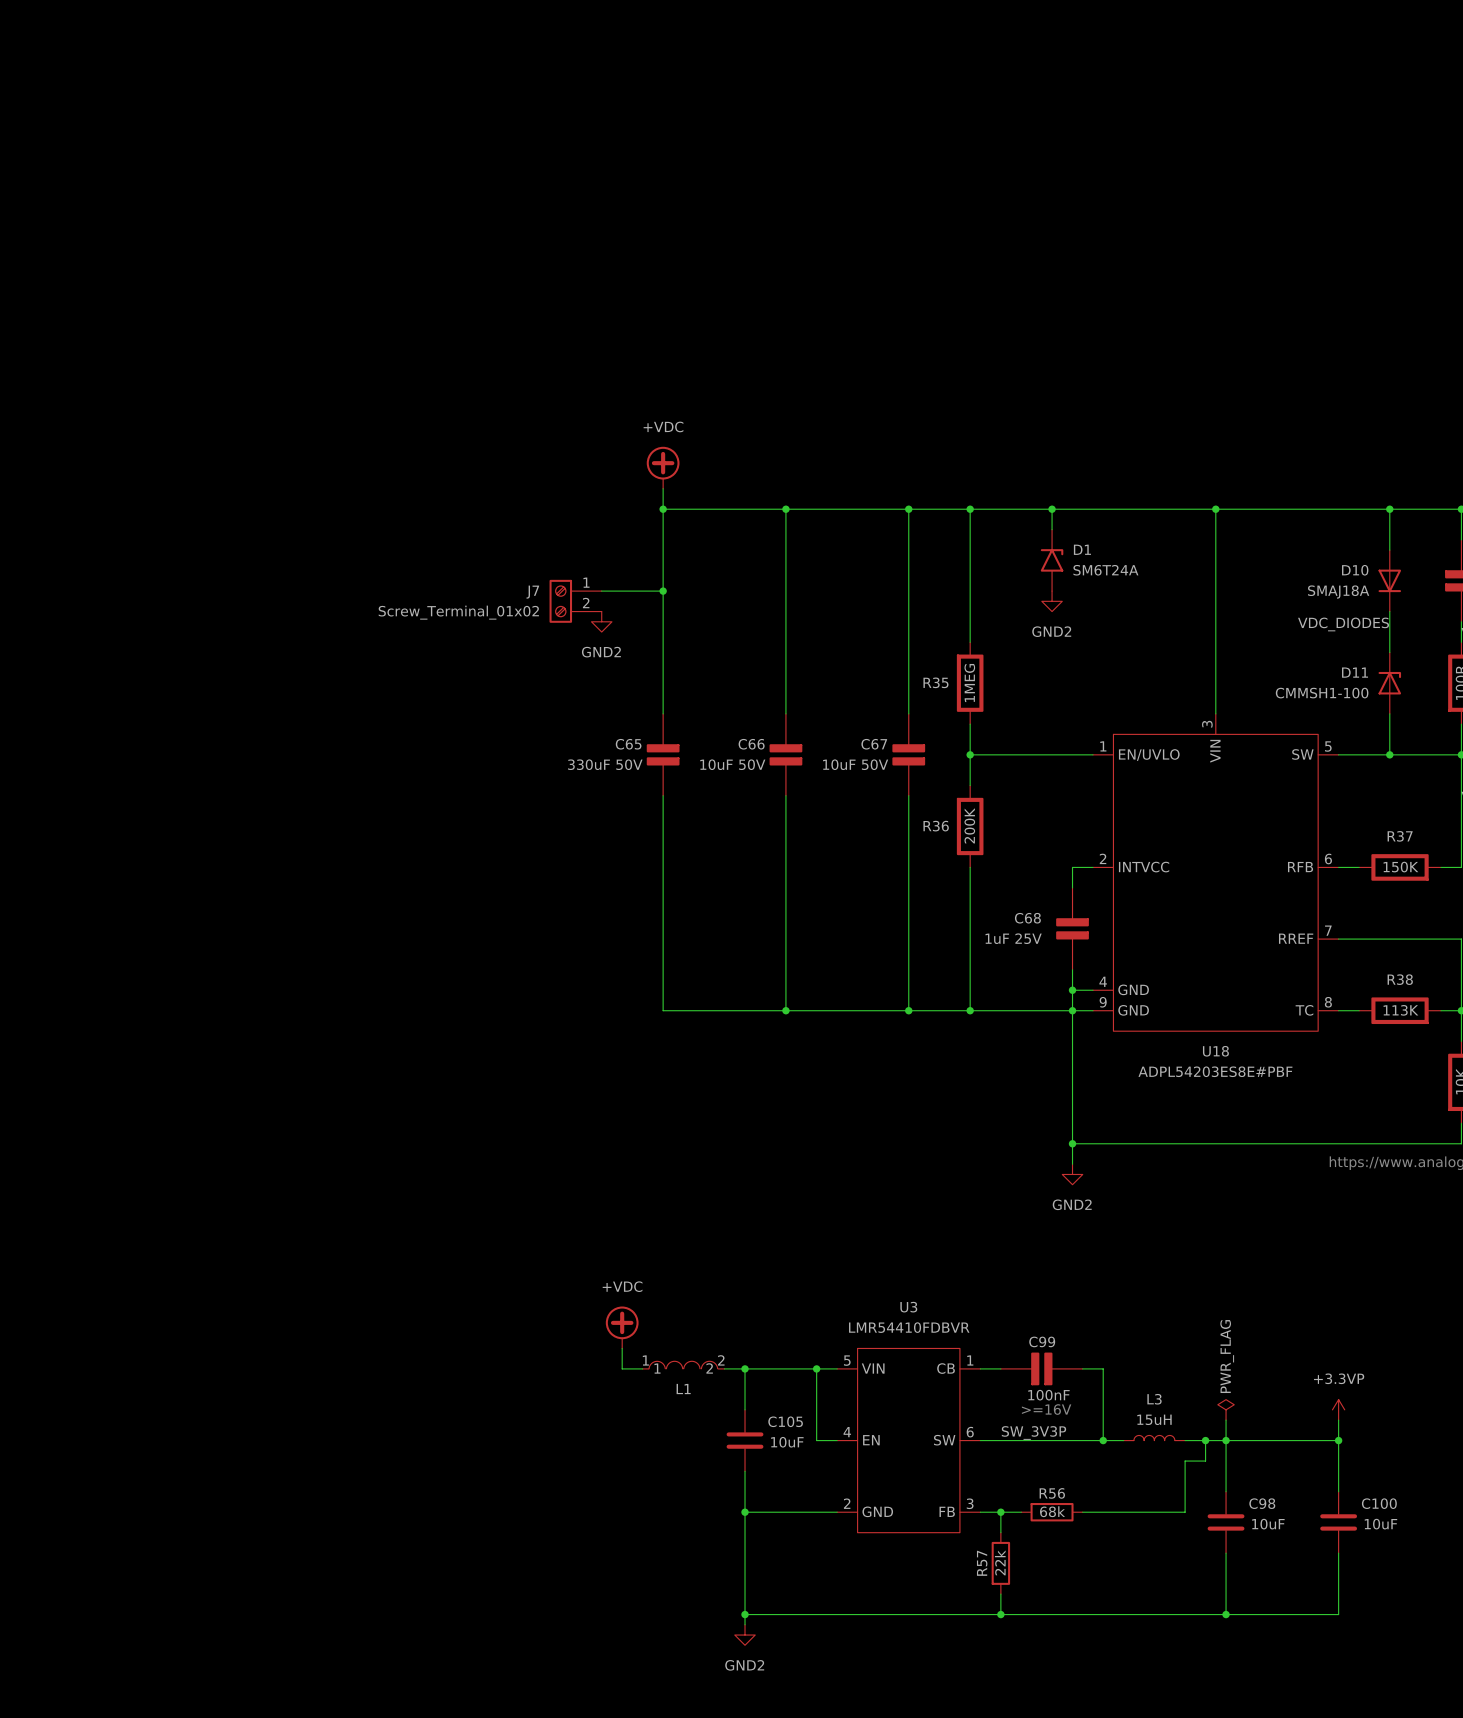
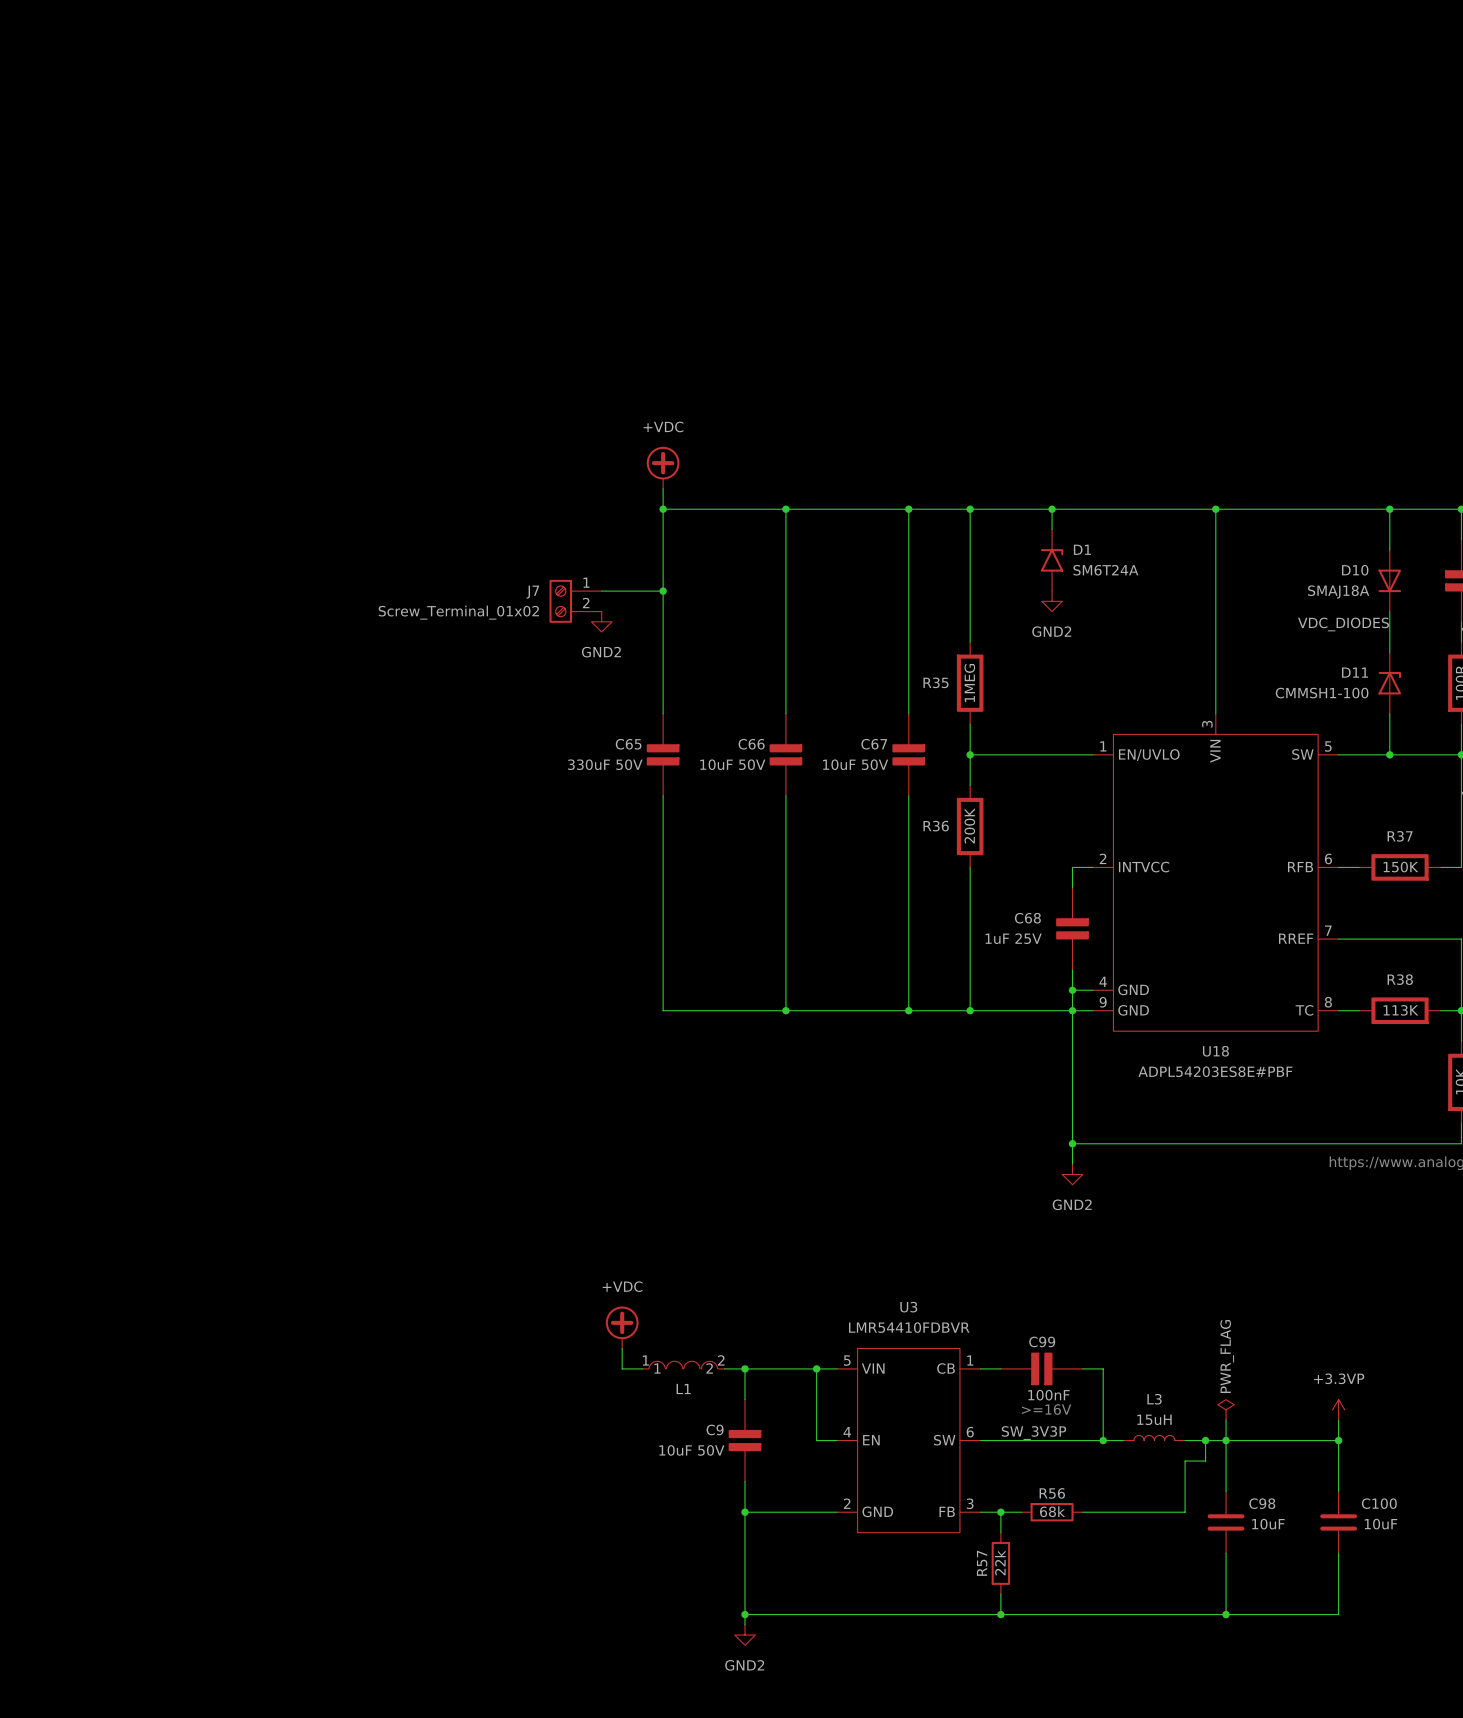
C105: 10uF (745, 1440) -> none
C9: none -> 10uF 50V (745, 1440)

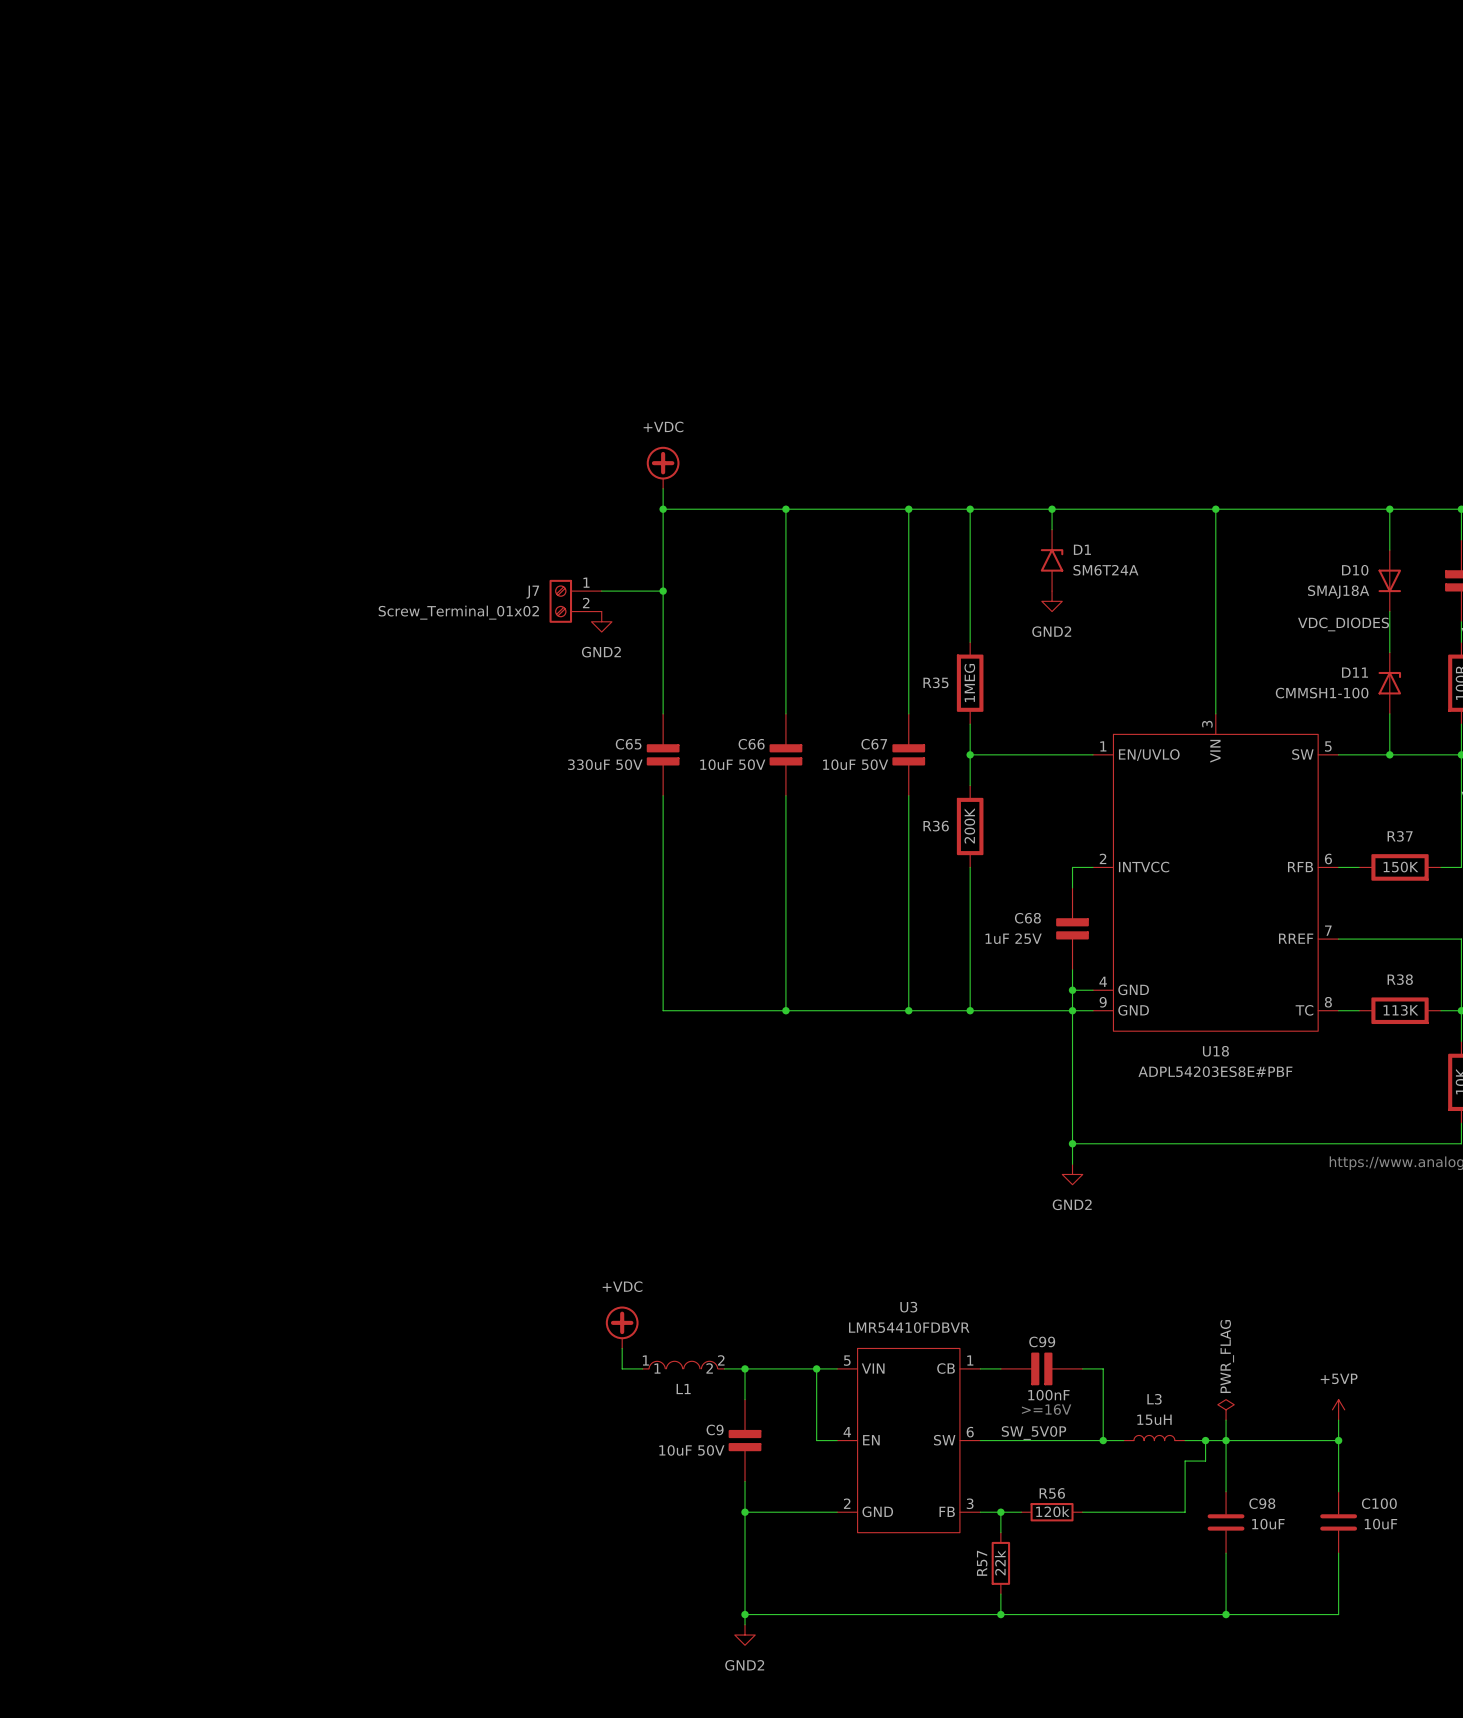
power symbol: +3.3VP (1338, 1409) -> +5VP (1338, 1409)
label: SW_3V3P (1033, 1433) -> SW_5V0P (1033, 1433)
R56 value: 68k (1052, 1511) -> 120k (1052, 1511)

